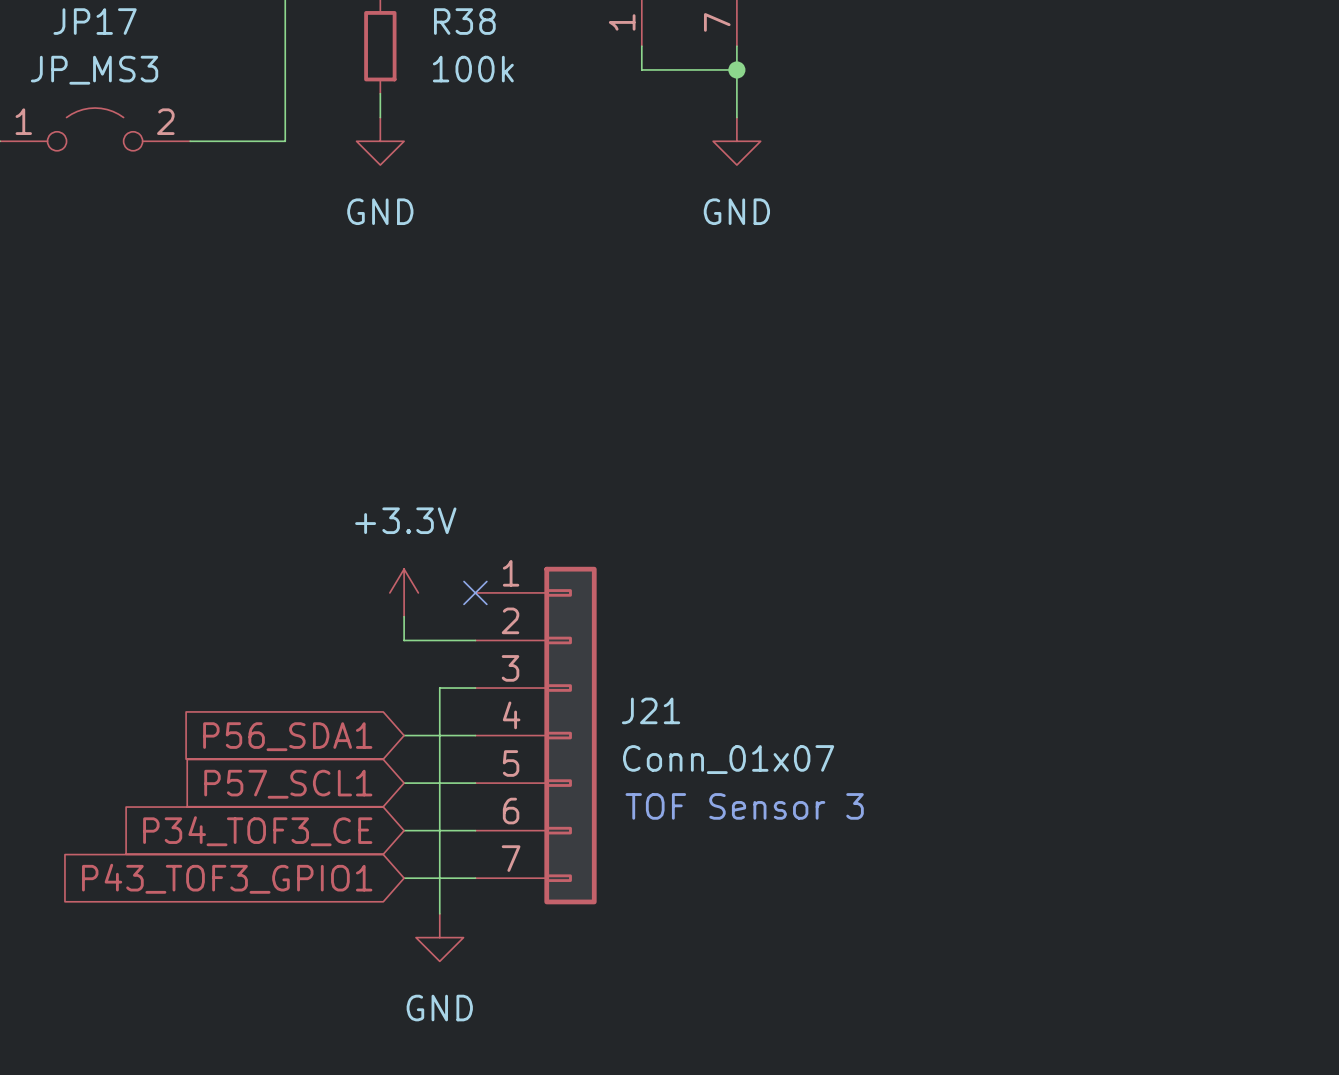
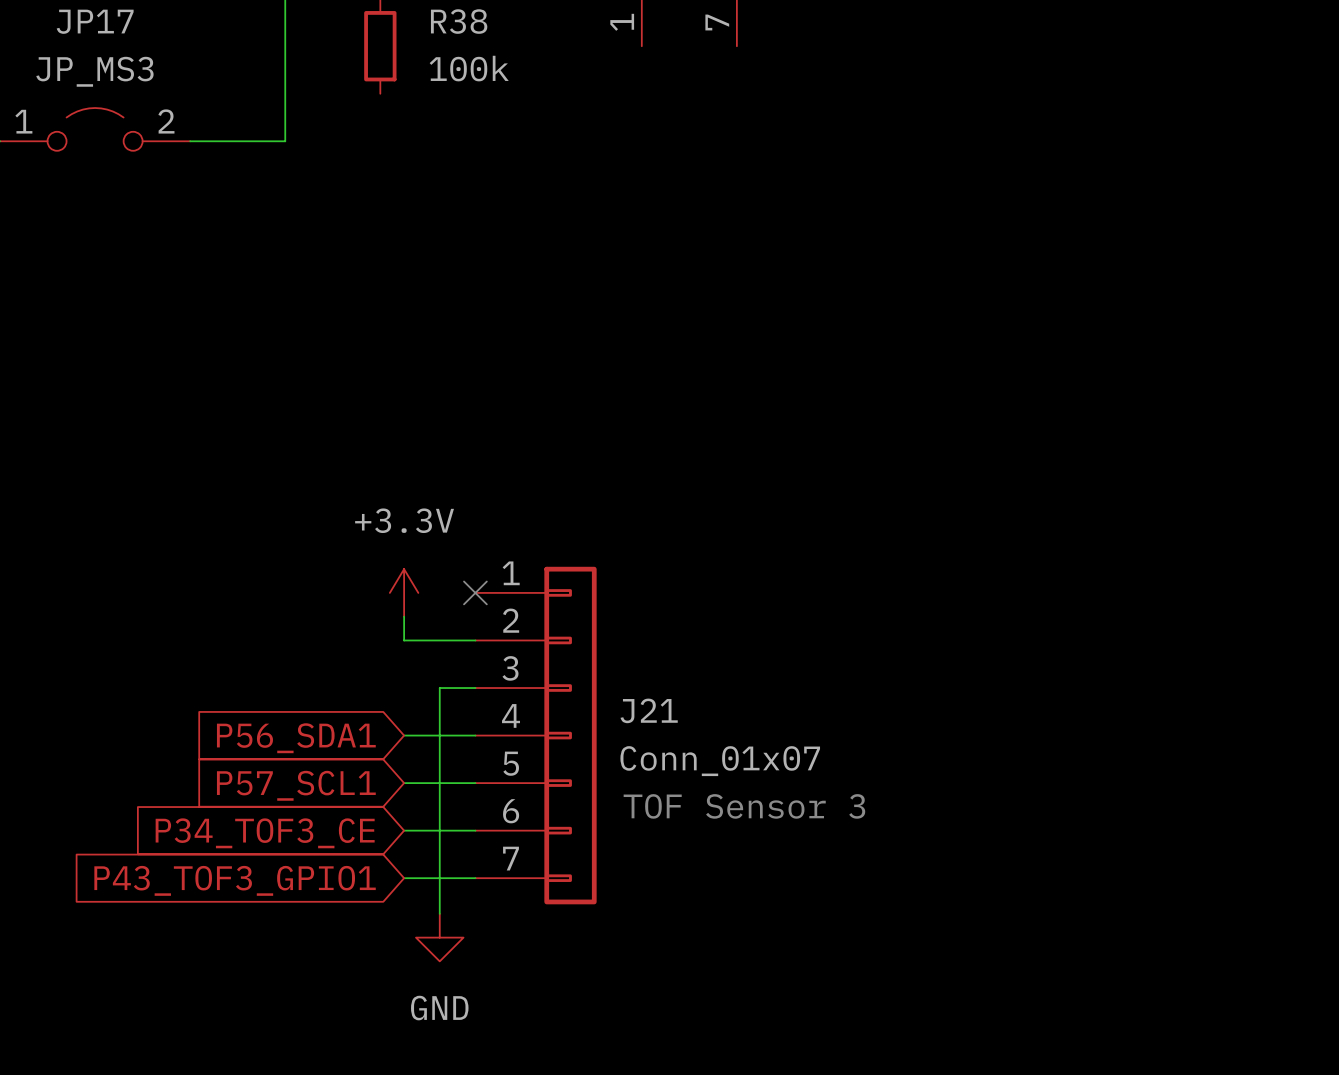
wire: (641, 46) (641, 69) (736, 69) -> none
wire: (736, 46) (736, 117) -> none
junction: (736, 69) -> none
wire: (380, 93) (380, 117) -> none
power symbol: GND (380, 141) -> none
power symbol: GND (736, 141) -> none

